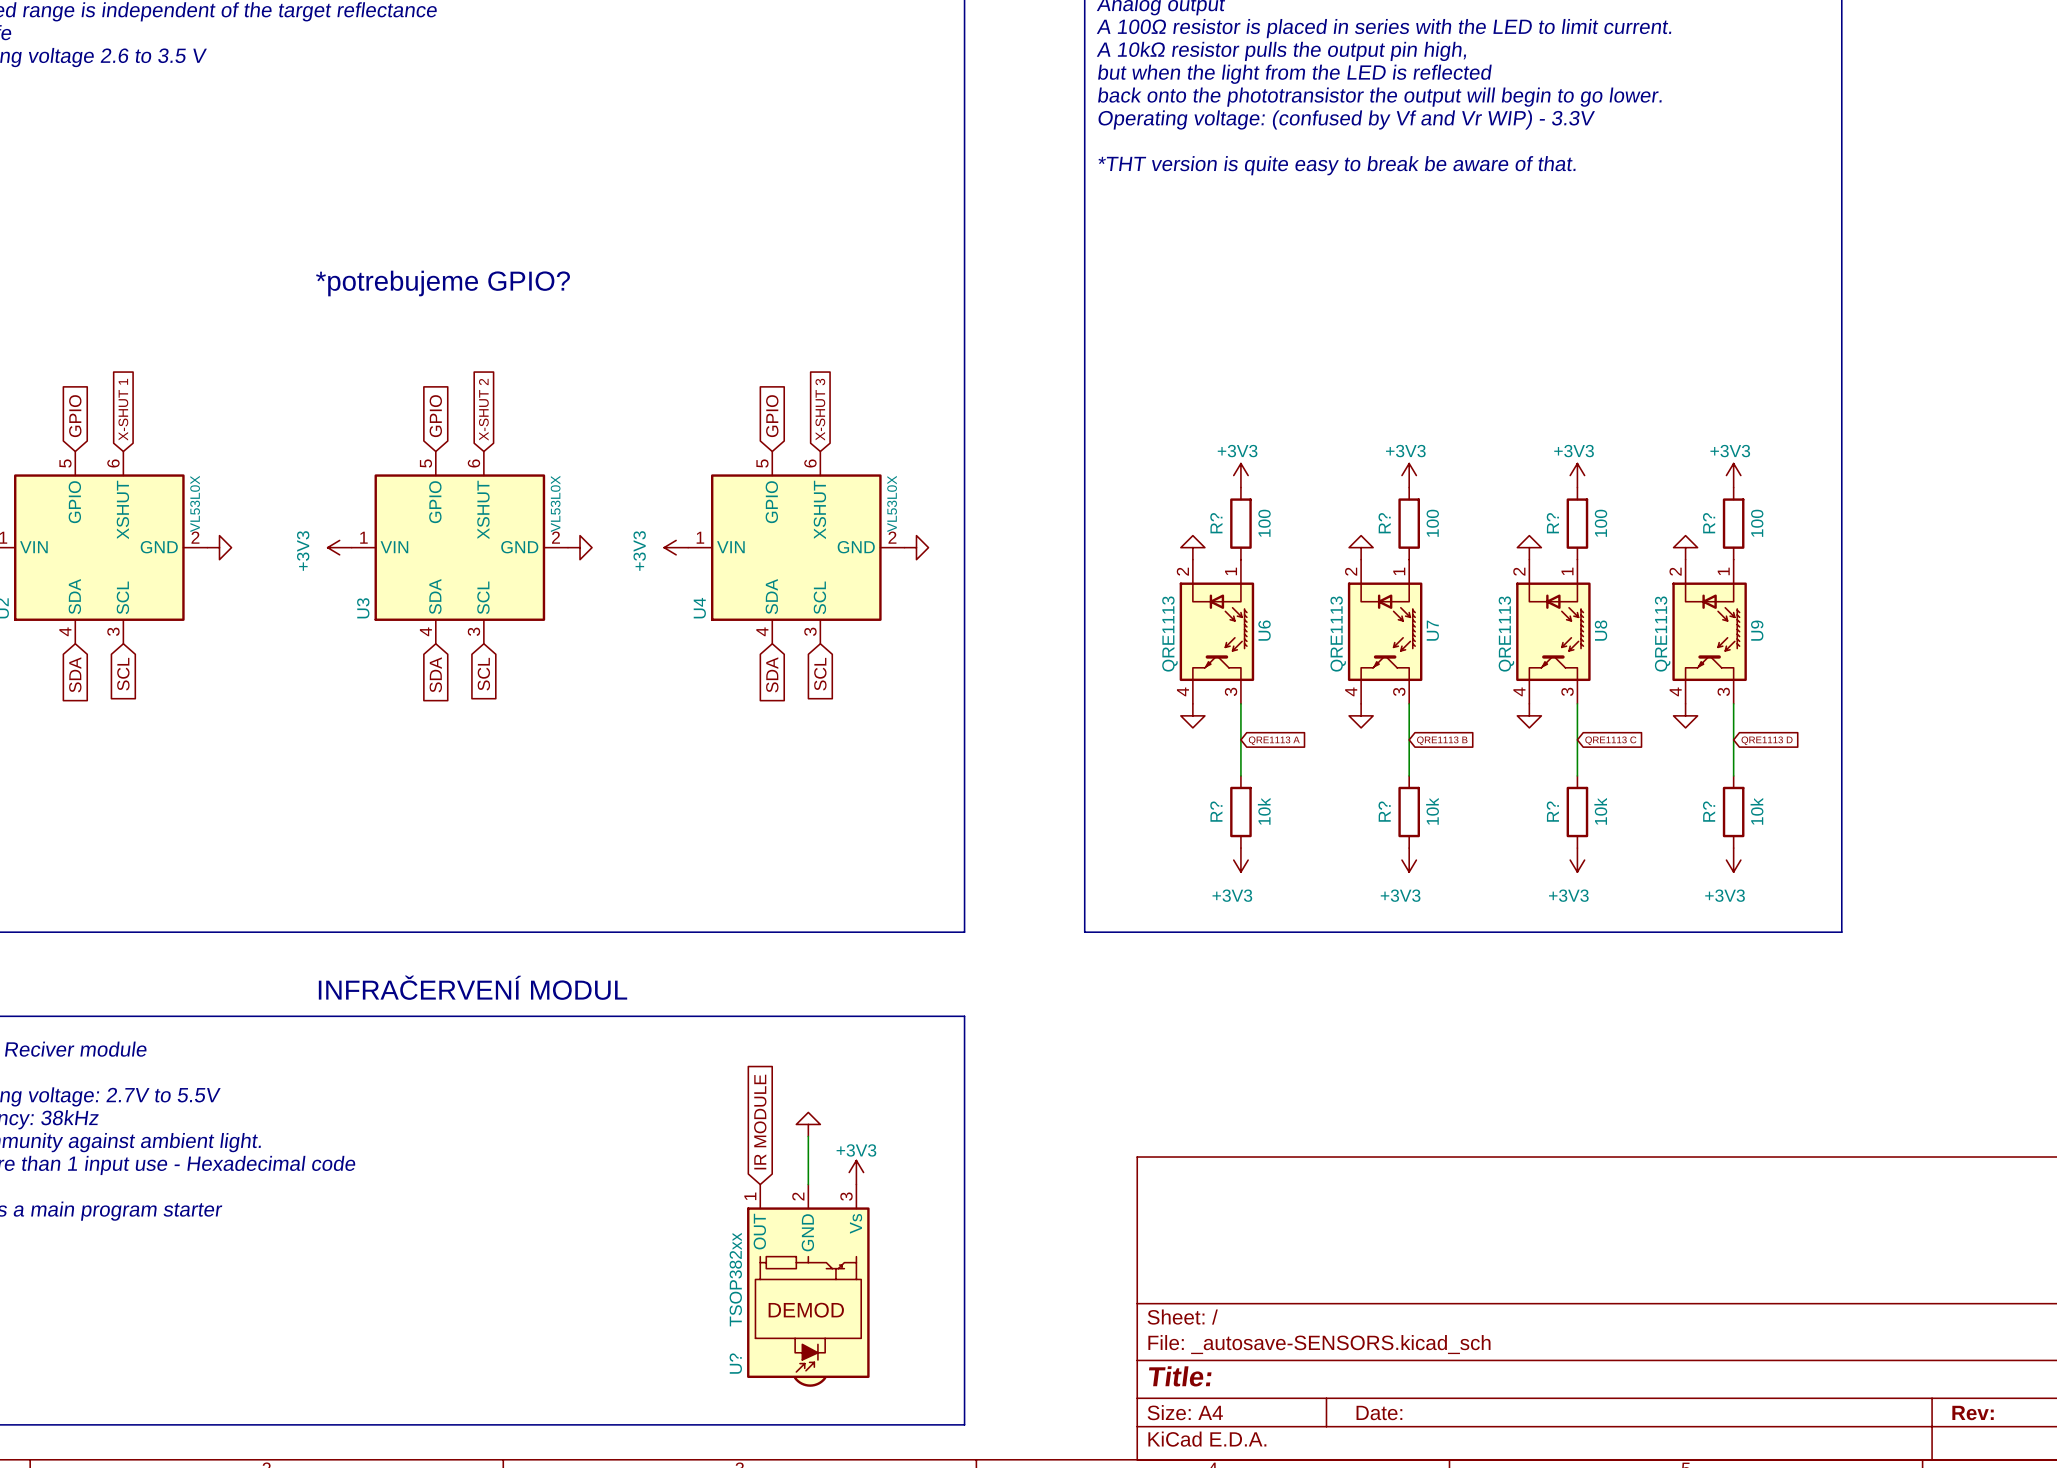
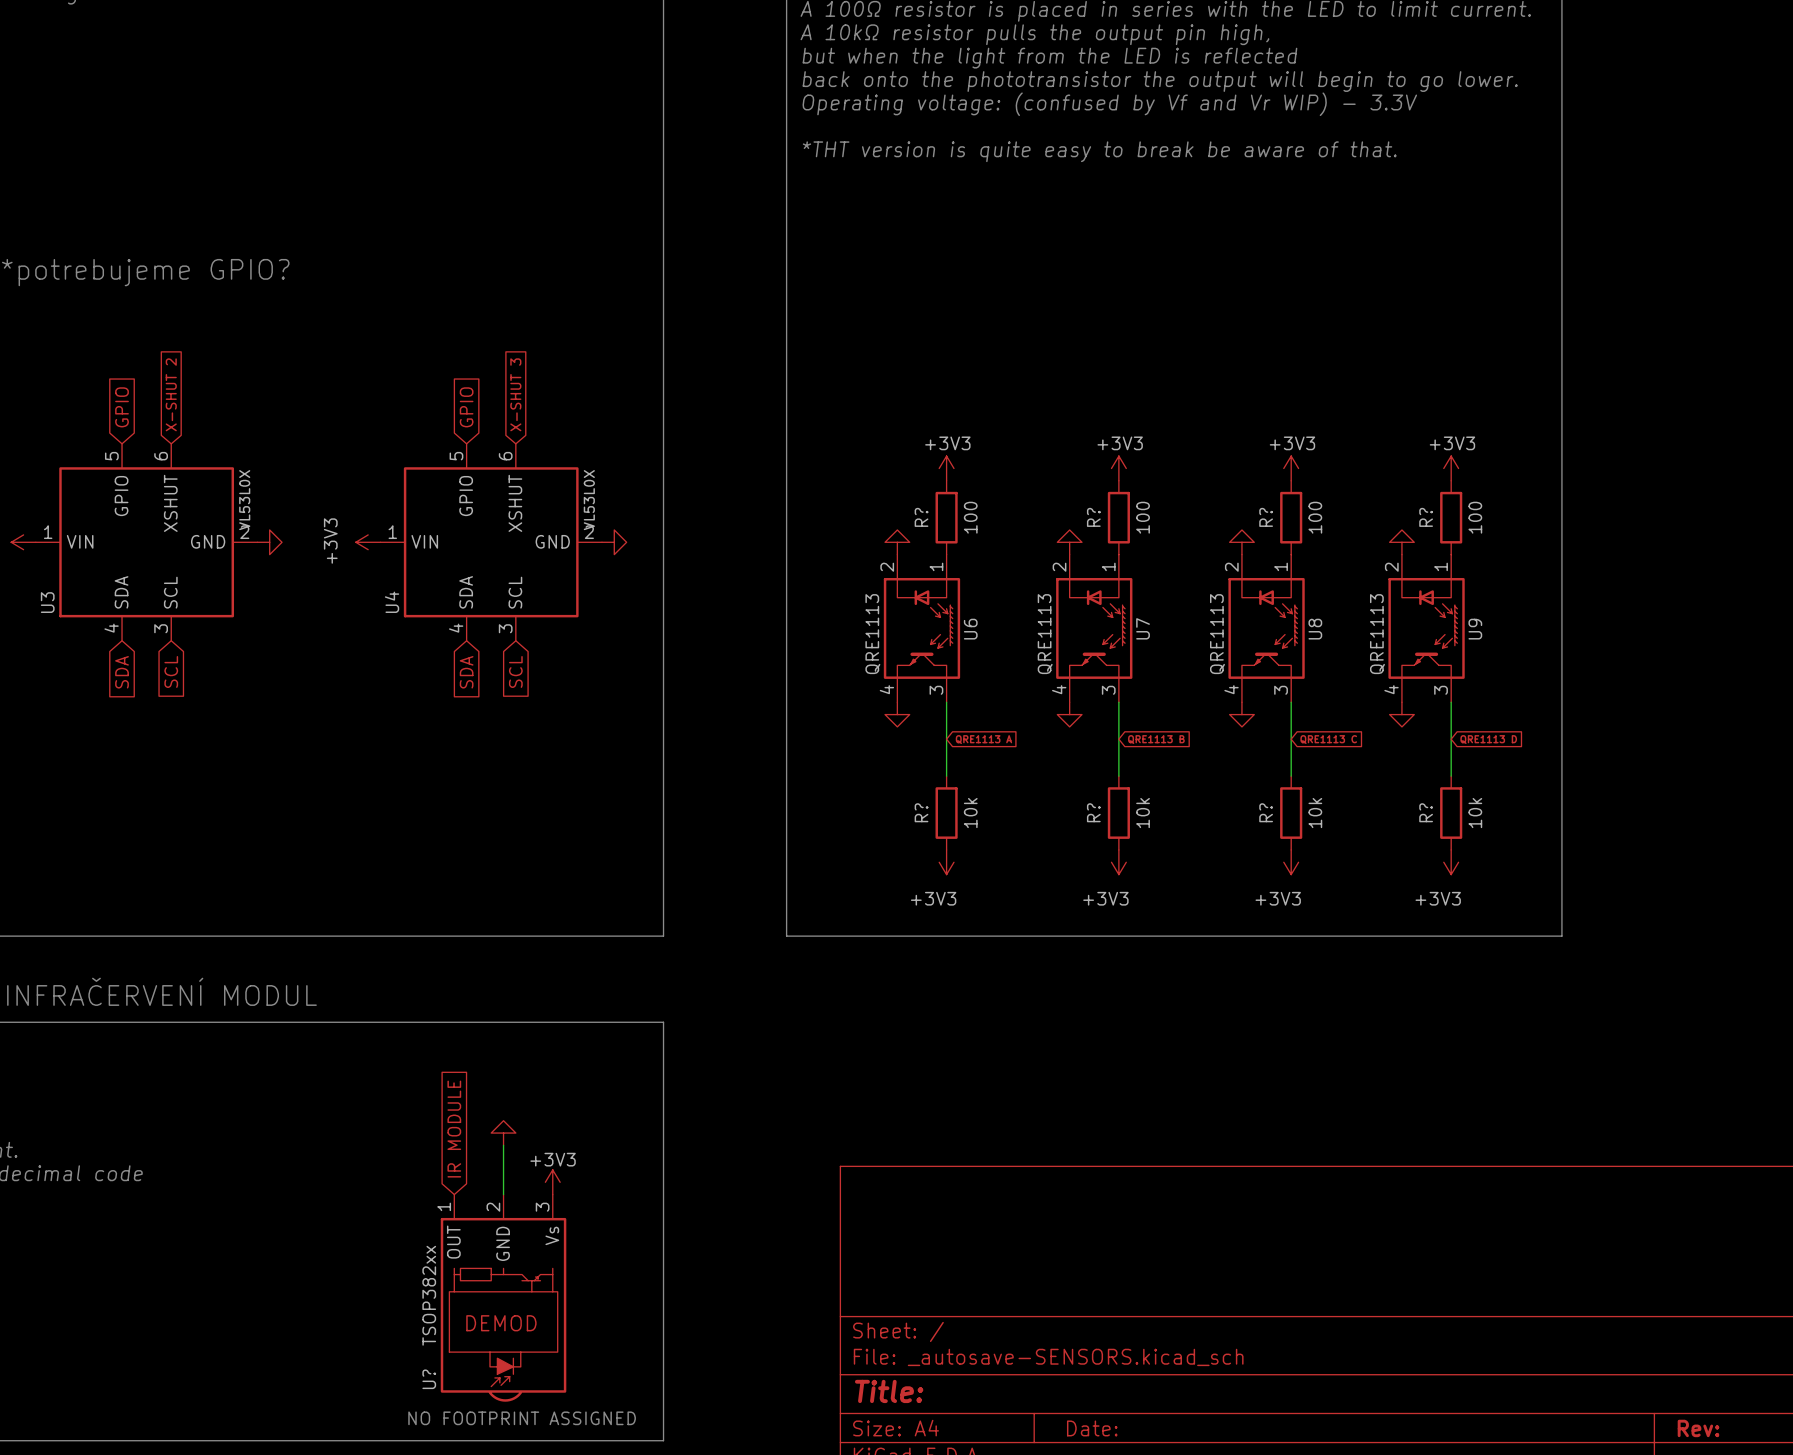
text: none -> NO FOOTPRINT ASSIGNED (522, 1418)

